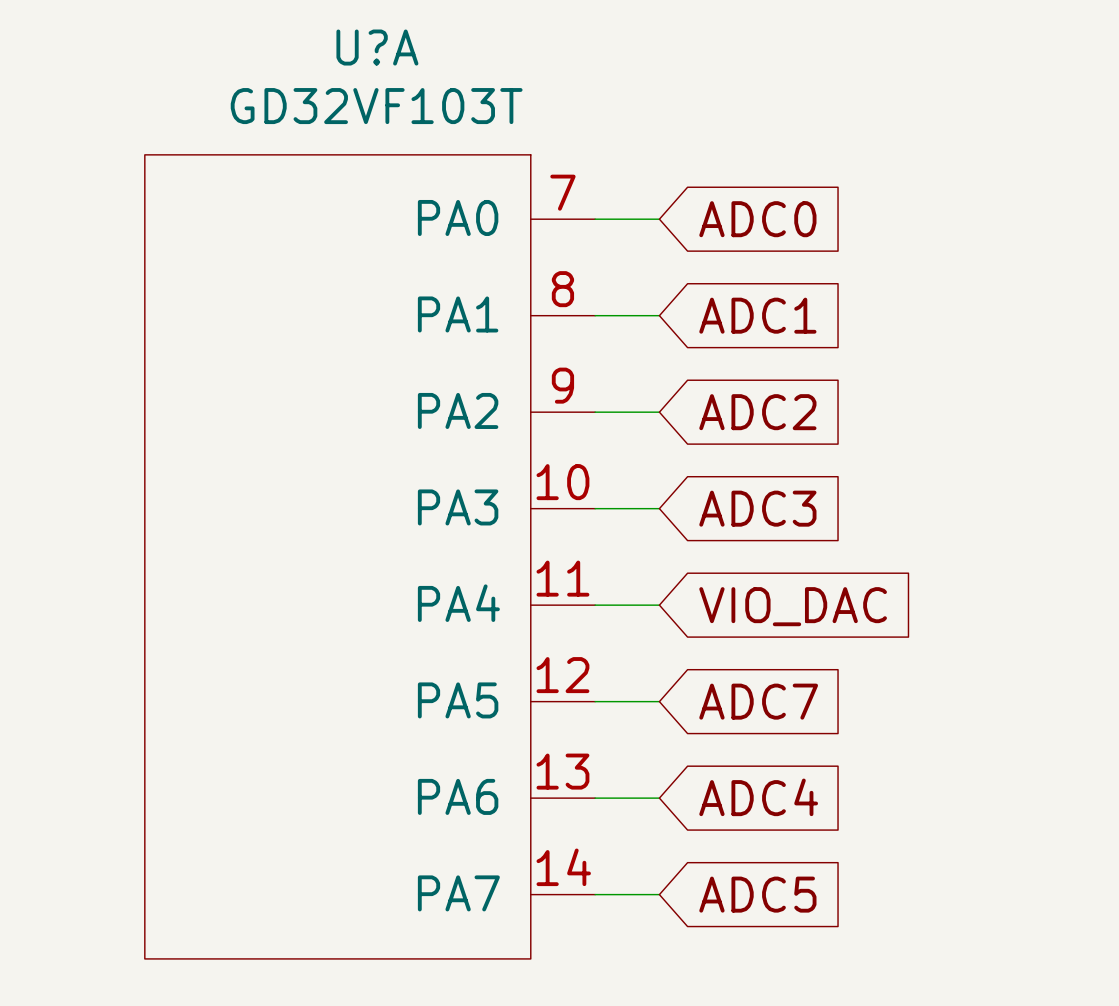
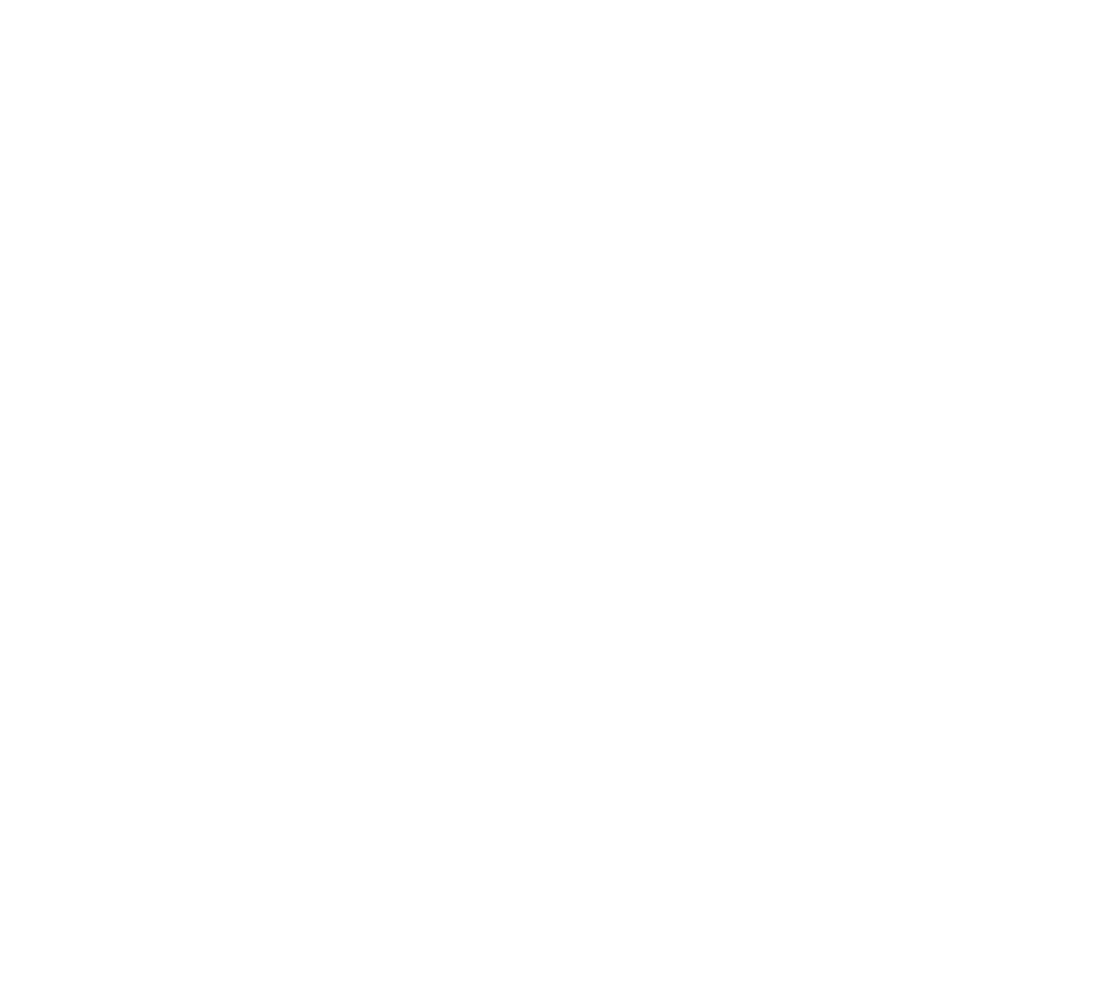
wire: (595, 219) (659, 219) -> none
global label: ADC0 (757, 219) -> none
wire: (595, 315) (659, 315) -> none
global label: ADC1 (757, 315) -> none
wire: (595, 412) (659, 412) -> none
global label: ADC2 (757, 412) -> none
wire: (595, 508) (659, 508) -> none
global label: ADC3 (757, 508) -> none
U?A: GD32VF103T (369, 556) -> none
wire: (595, 605) (659, 605) -> none
global label: VIO_DAC (793, 606) -> none
wire: (595, 701) (659, 701) -> none
global label: ADC7 (758, 701) -> none
global label: ADC4 (758, 797) -> none
wire: (595, 798) (659, 798) -> none
wire: (595, 894) (659, 894) -> none
global label: ADC5 (757, 894) -> none

